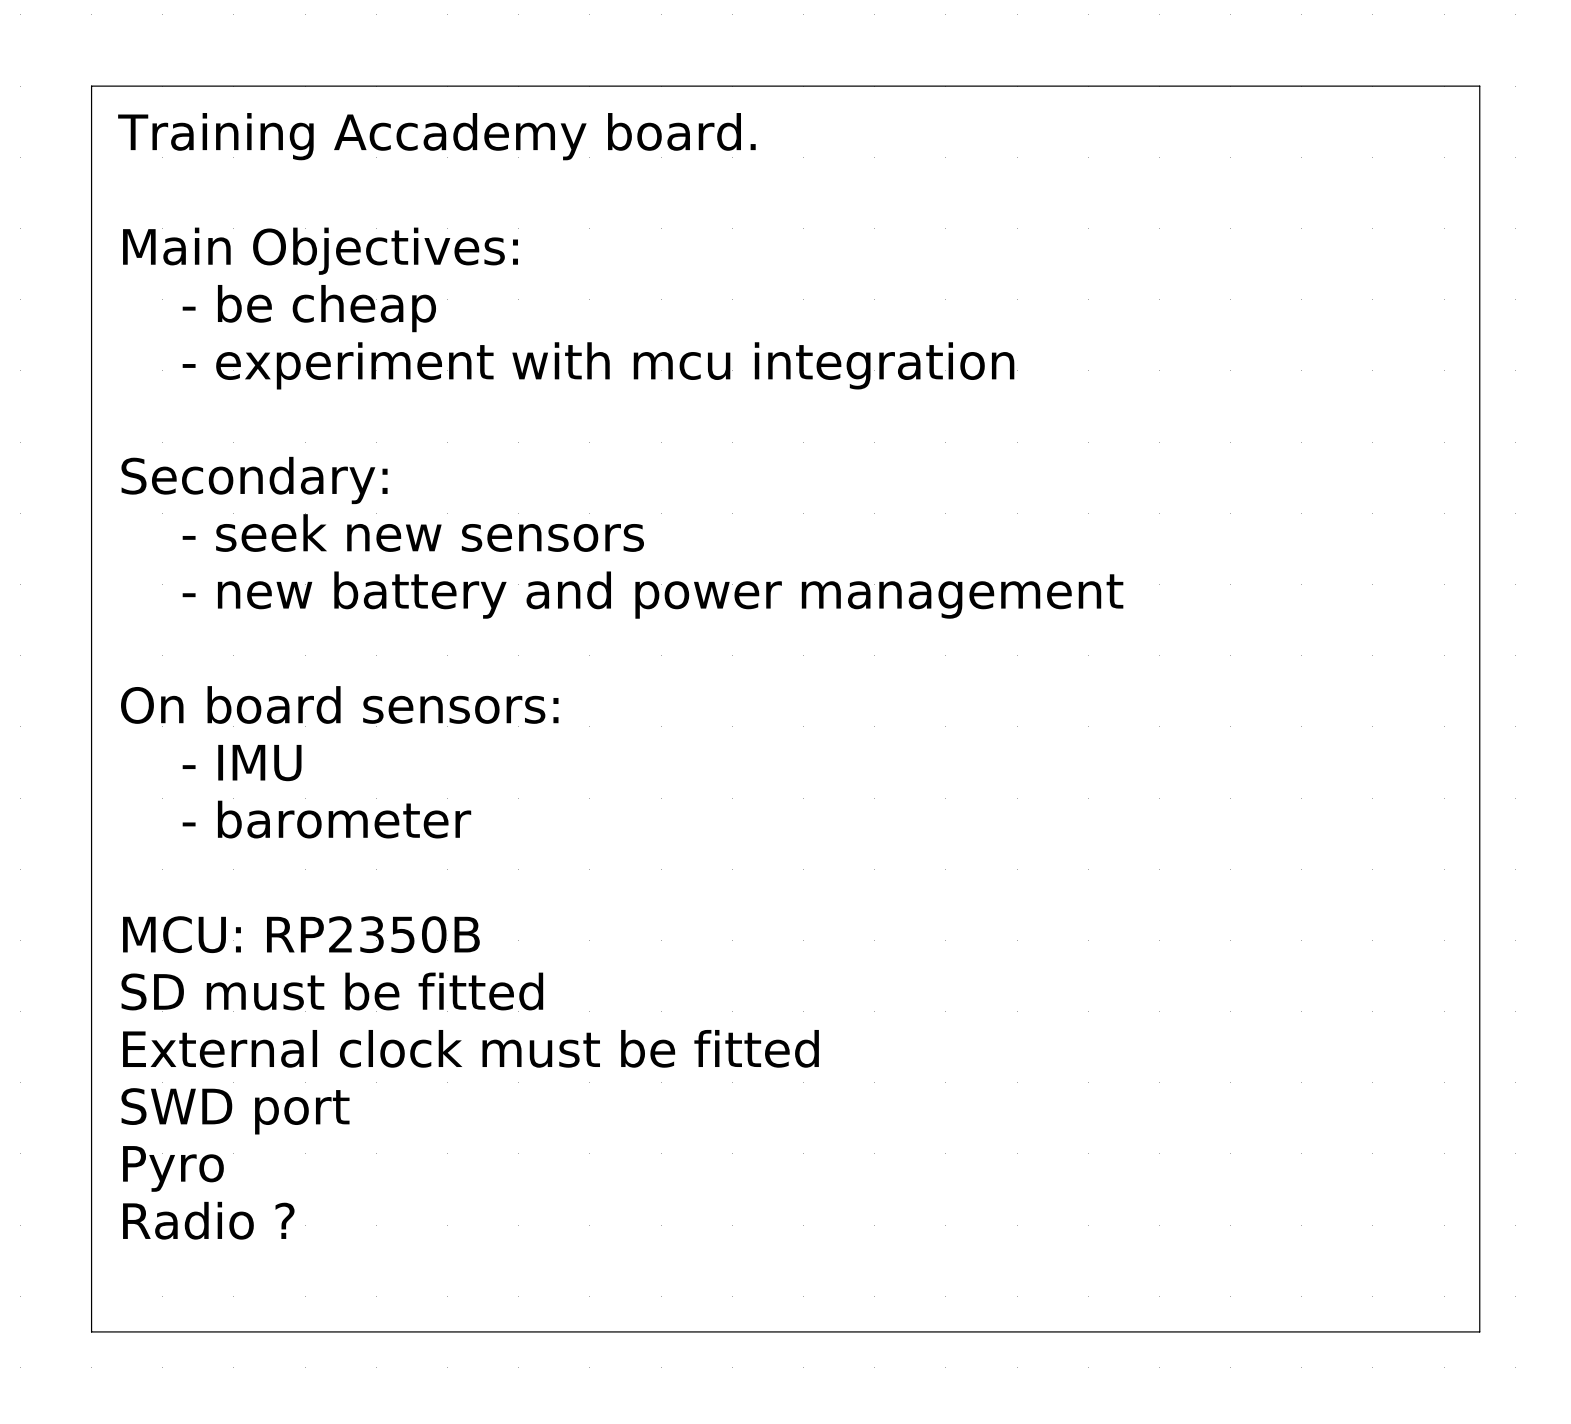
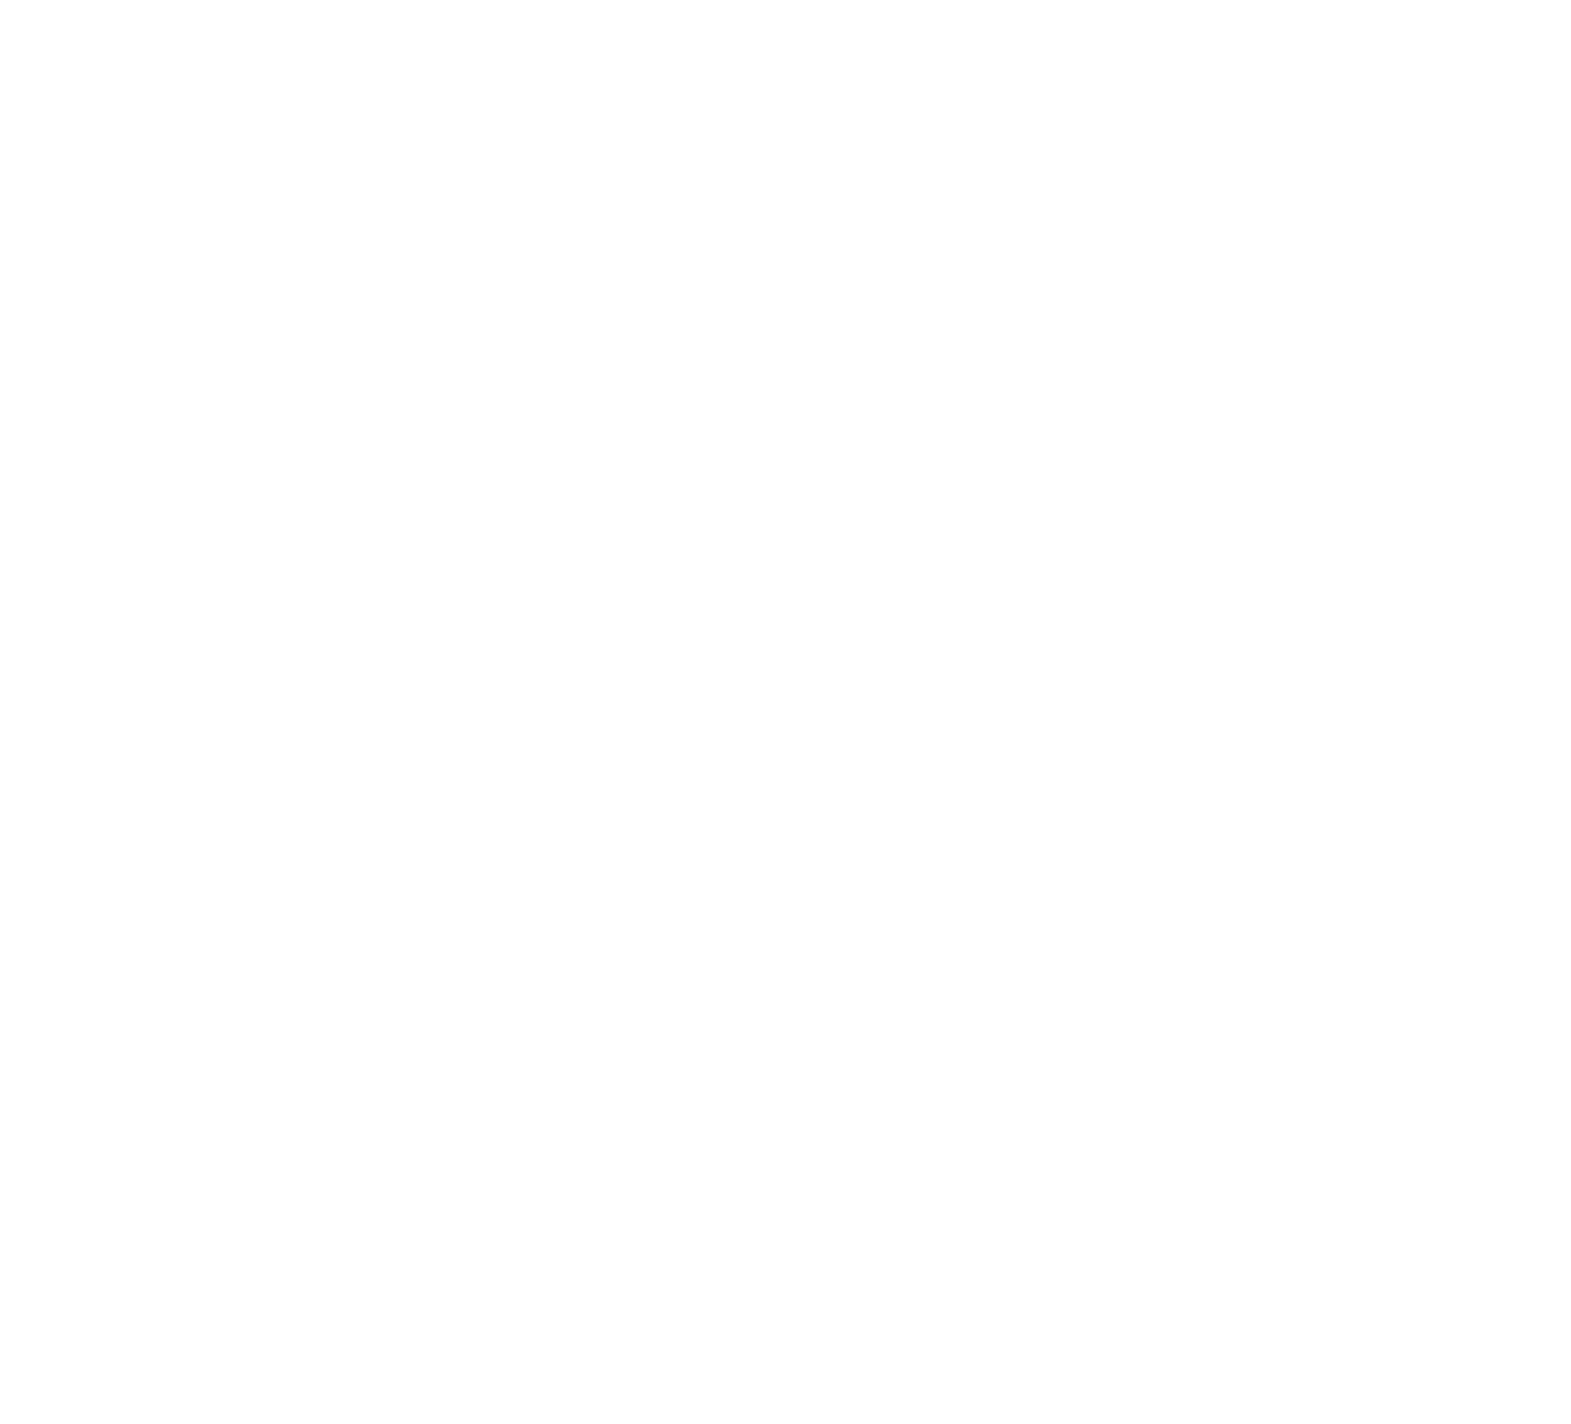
line: (91, 86) (1479, 86) (1479, 1331) (91, 1331) (91, 86) -> none
text: Training Accademy board. (436, 136) -> none
text: Main Objectives: (320, 251) -> none
text: - be cheap (309, 308) -> none
text: - experiment with mcu integration (598, 365) -> none
text: Secondary: (254, 480) -> none
text: - seek new sensors (413, 533) -> none
text: - new battery and power management (653, 595) -> none
text: On board sensors: (339, 704) -> none
text: - IMU (242, 763) -> none
text: - barometer (326, 819) -> none
text: MCU: RP2350B (301, 934) -> none
text: SD must be fitted (332, 991) -> none
text: External clock must be fitted (470, 1048) -> none
text: SWD port (235, 1111) -> none
text: Pyro (173, 1168) -> none
text: Radio ? (208, 1220) -> none

